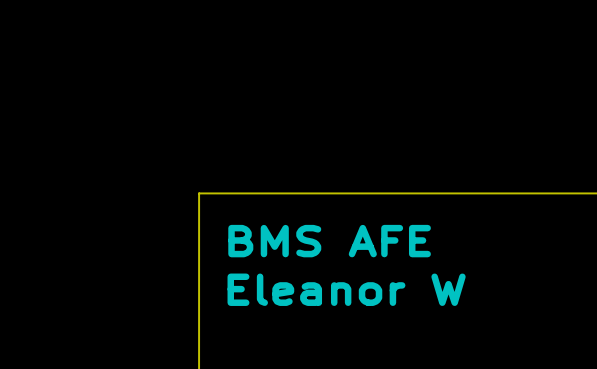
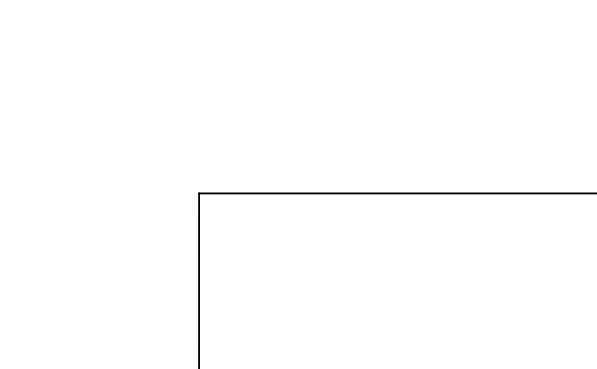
text: BMS AFE (329, 241) -> none
text: Eleanor W (346, 289) -> none

